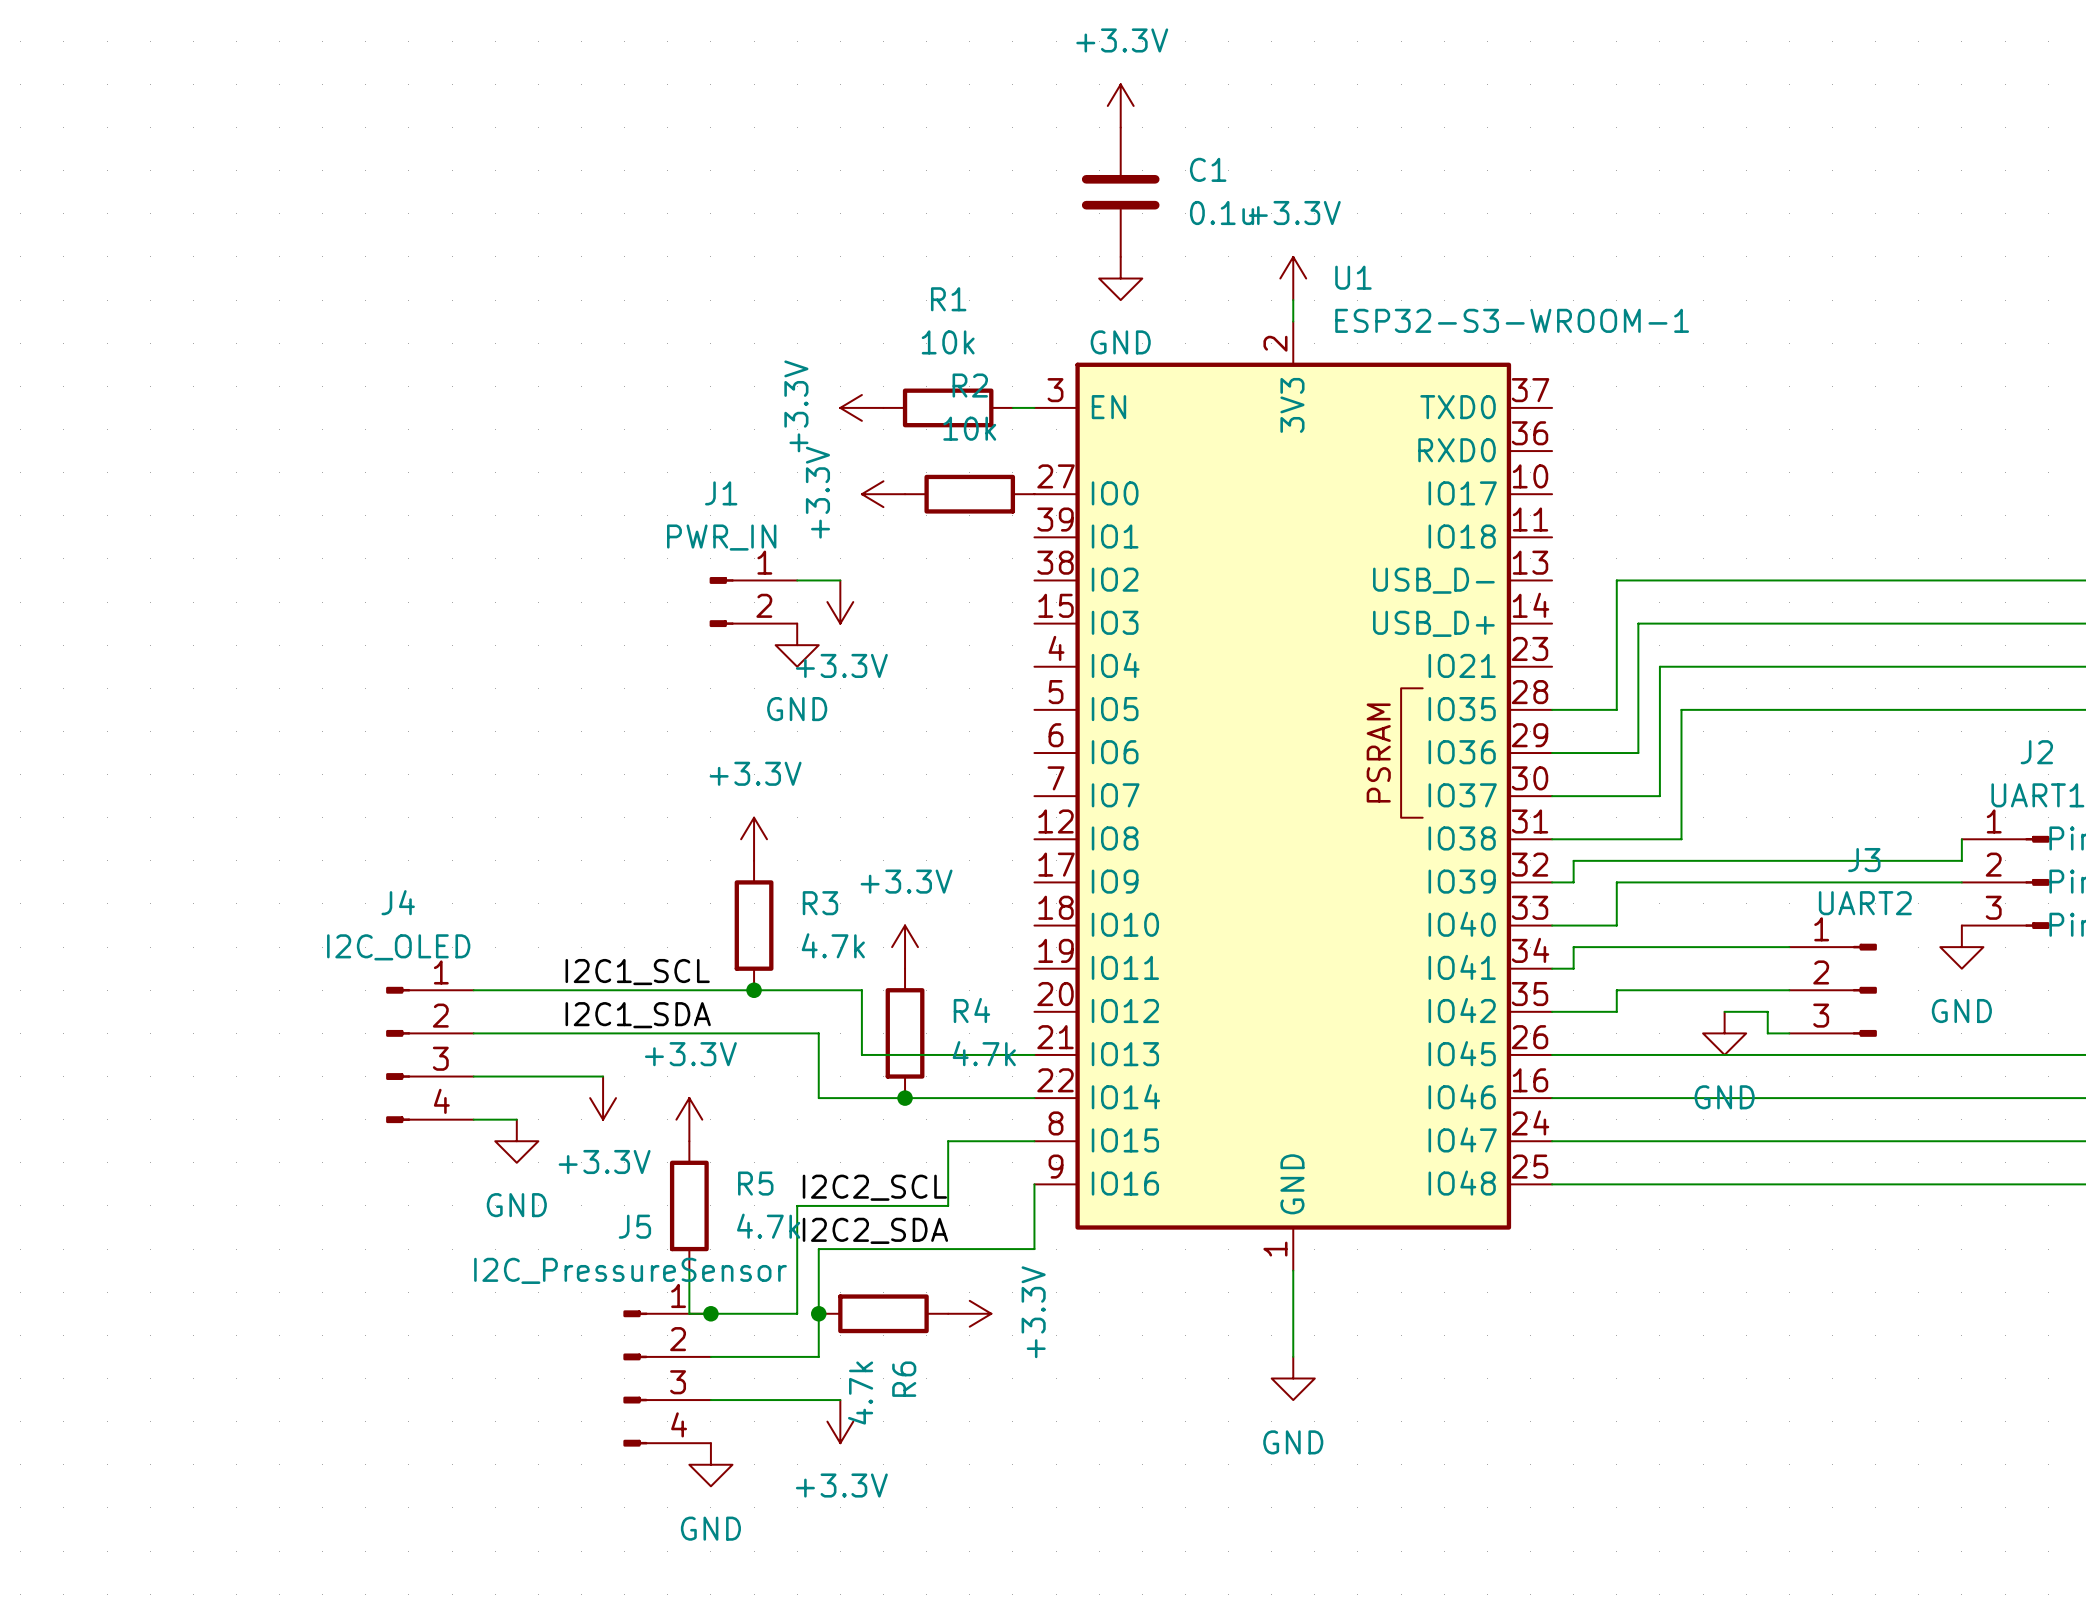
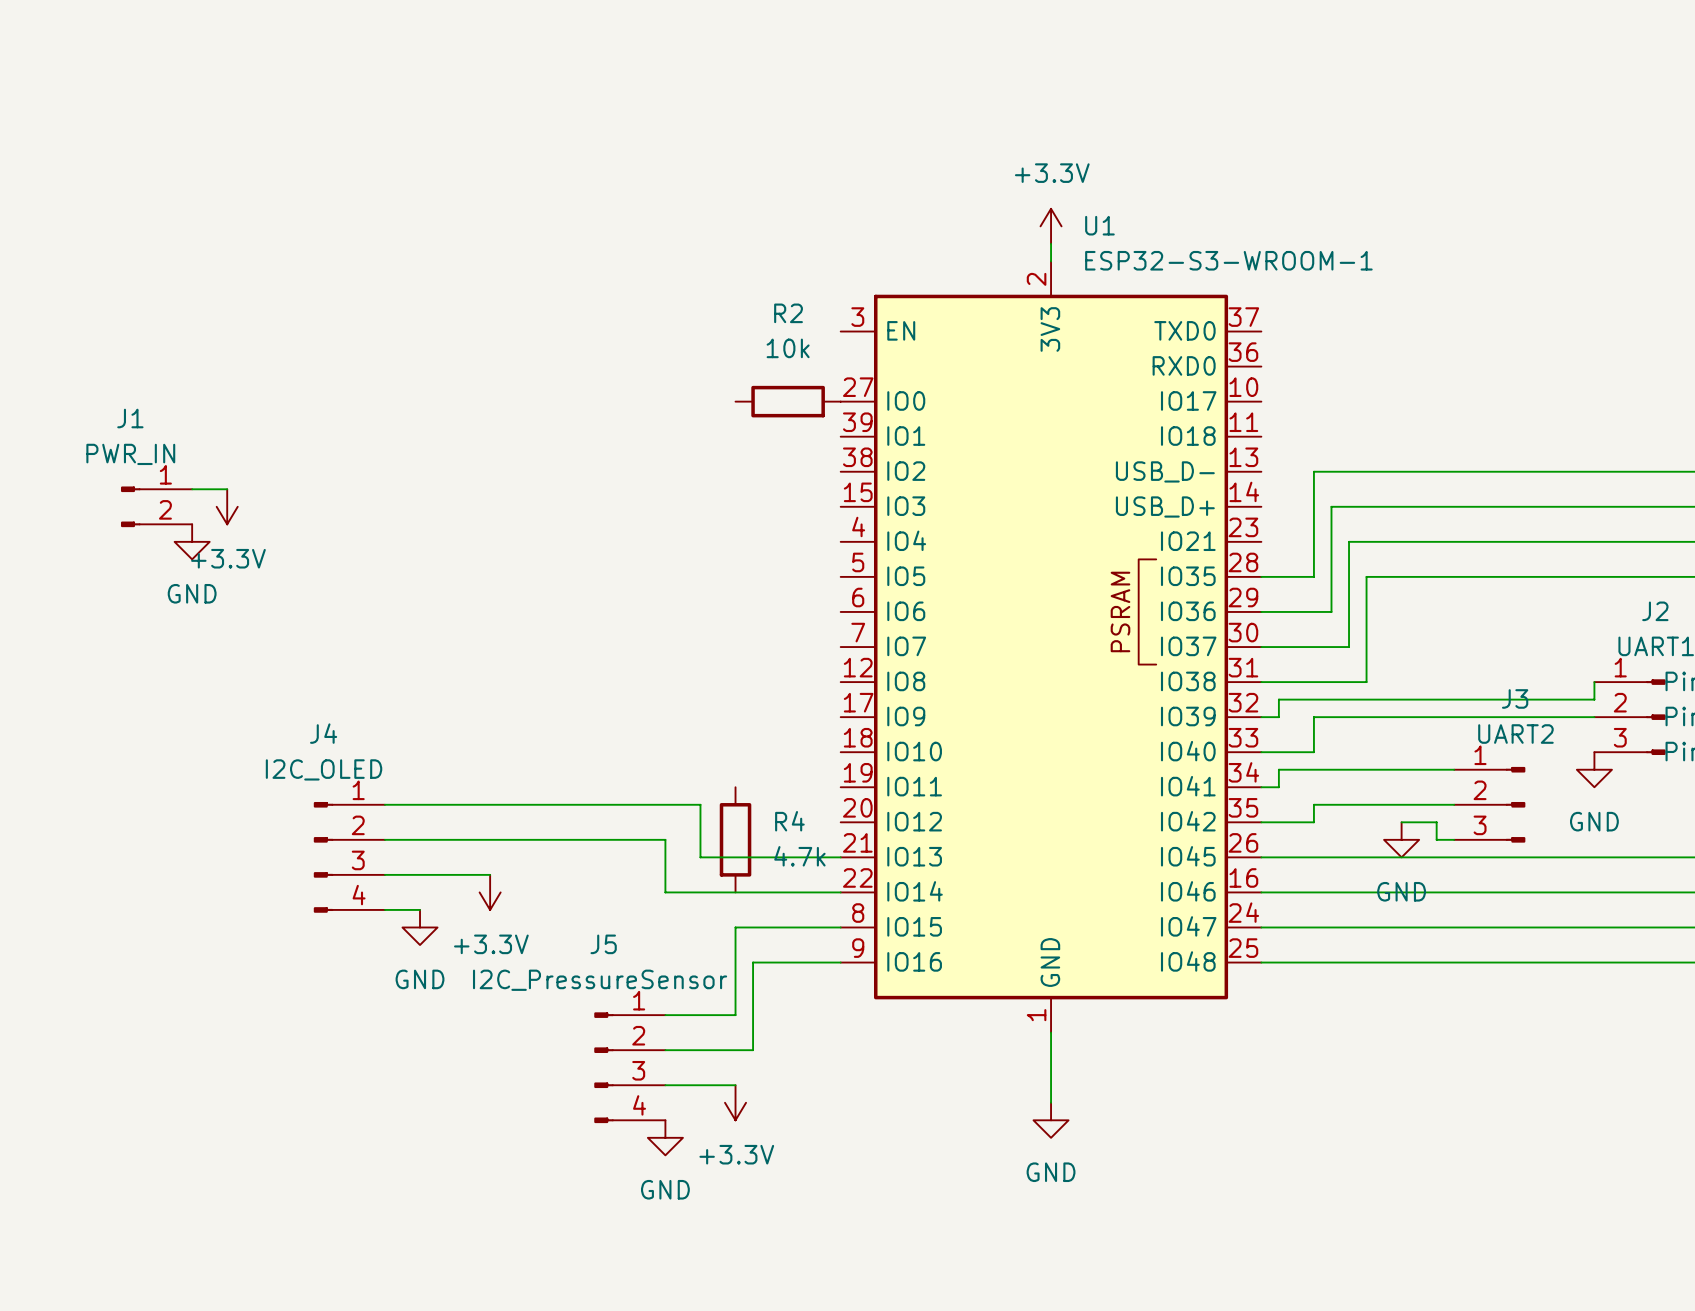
power symbol: +3.3V (1120, 105) -> none
C1: 0.1u (1120, 192) -> none
power symbol: GND (1120, 278) -> none
power symbol: +3.3V (861, 407) -> none
R1: 10k (948, 407) -> none
wire: (1012, 407) (1034, 407) -> none
power symbol: +3.3V (883, 494) -> none
wire: (797, 580) (840, 580) -> none
wire: none -> (192, 489) (227, 489)
J1 position: (753, 602) -> (156, 506)
power symbol: +3.3V (840, 602) -> none
power symbol: none -> +3.3V (227, 506)
power symbol: GND (797, 645) -> none
power symbol: none -> GND (192, 541)
power symbol: +3.3V (754, 839) -> none
R3: 4.7k (754, 925) -> none
power symbol: +3.3V (905, 947) -> none
label: I2C1_SCL (637, 972) -> none
junction: (754, 990) -> none
label: I2C1_SDA (638, 1015) -> none
junction: (905, 1098) -> none
power symbol: +3.3V (689, 1119) -> none
wire: (948, 1141) (948, 1205) (797, 1205) (797, 1313) (689, 1313) (689, 1270) -> none
wire: (1034, 1184) (1034, 1249) (905, 1249) -> (770, 927) (735, 927) (735, 1015)
wire: none -> (840, 962) (753, 962) (753, 1050) (665, 1050)
label: I2C2_SCL (874, 1187) -> none
R5: 4.7k (689, 1205) -> none
label: I2C2_SDA (875, 1230) -> none
wire: (818, 1249) (818, 1356) (710, 1356) -> none
junction: (710, 1313) -> none
junction: (818, 1313) -> none
R6: 4.7k (883, 1313) -> none
power symbol: +3.3V (969, 1313) -> none
wire: none -> (665, 1085) (735, 1085)
power symbol: none -> +3.3V (735, 1102)
J5 position: (667, 1378) -> (629, 1067)
wire: (710, 1400) (840, 1400) -> none
power symbol: +3.3V (840, 1421) -> none
power symbol position: GND (710, 1464) -> GND (665, 1137)

